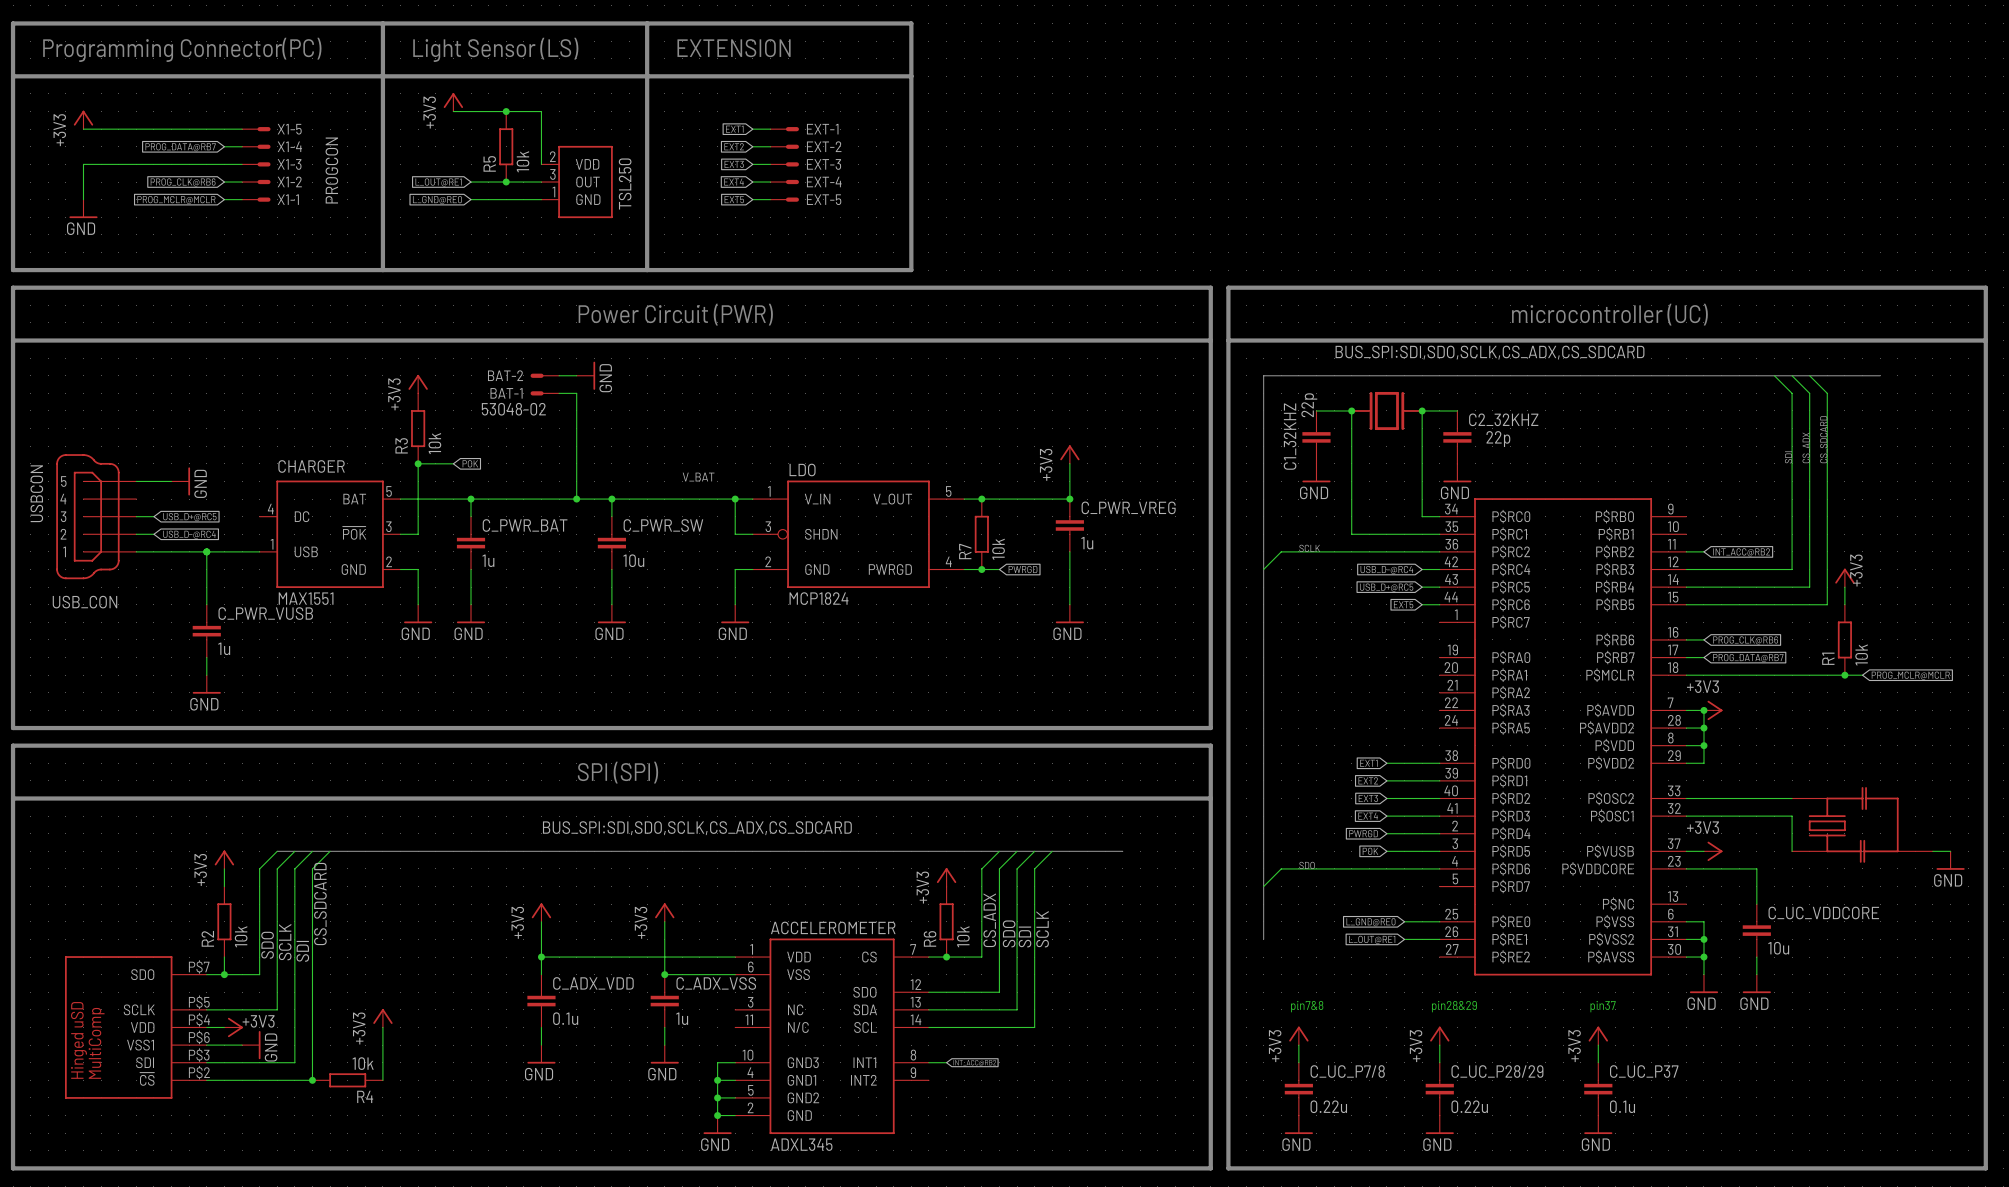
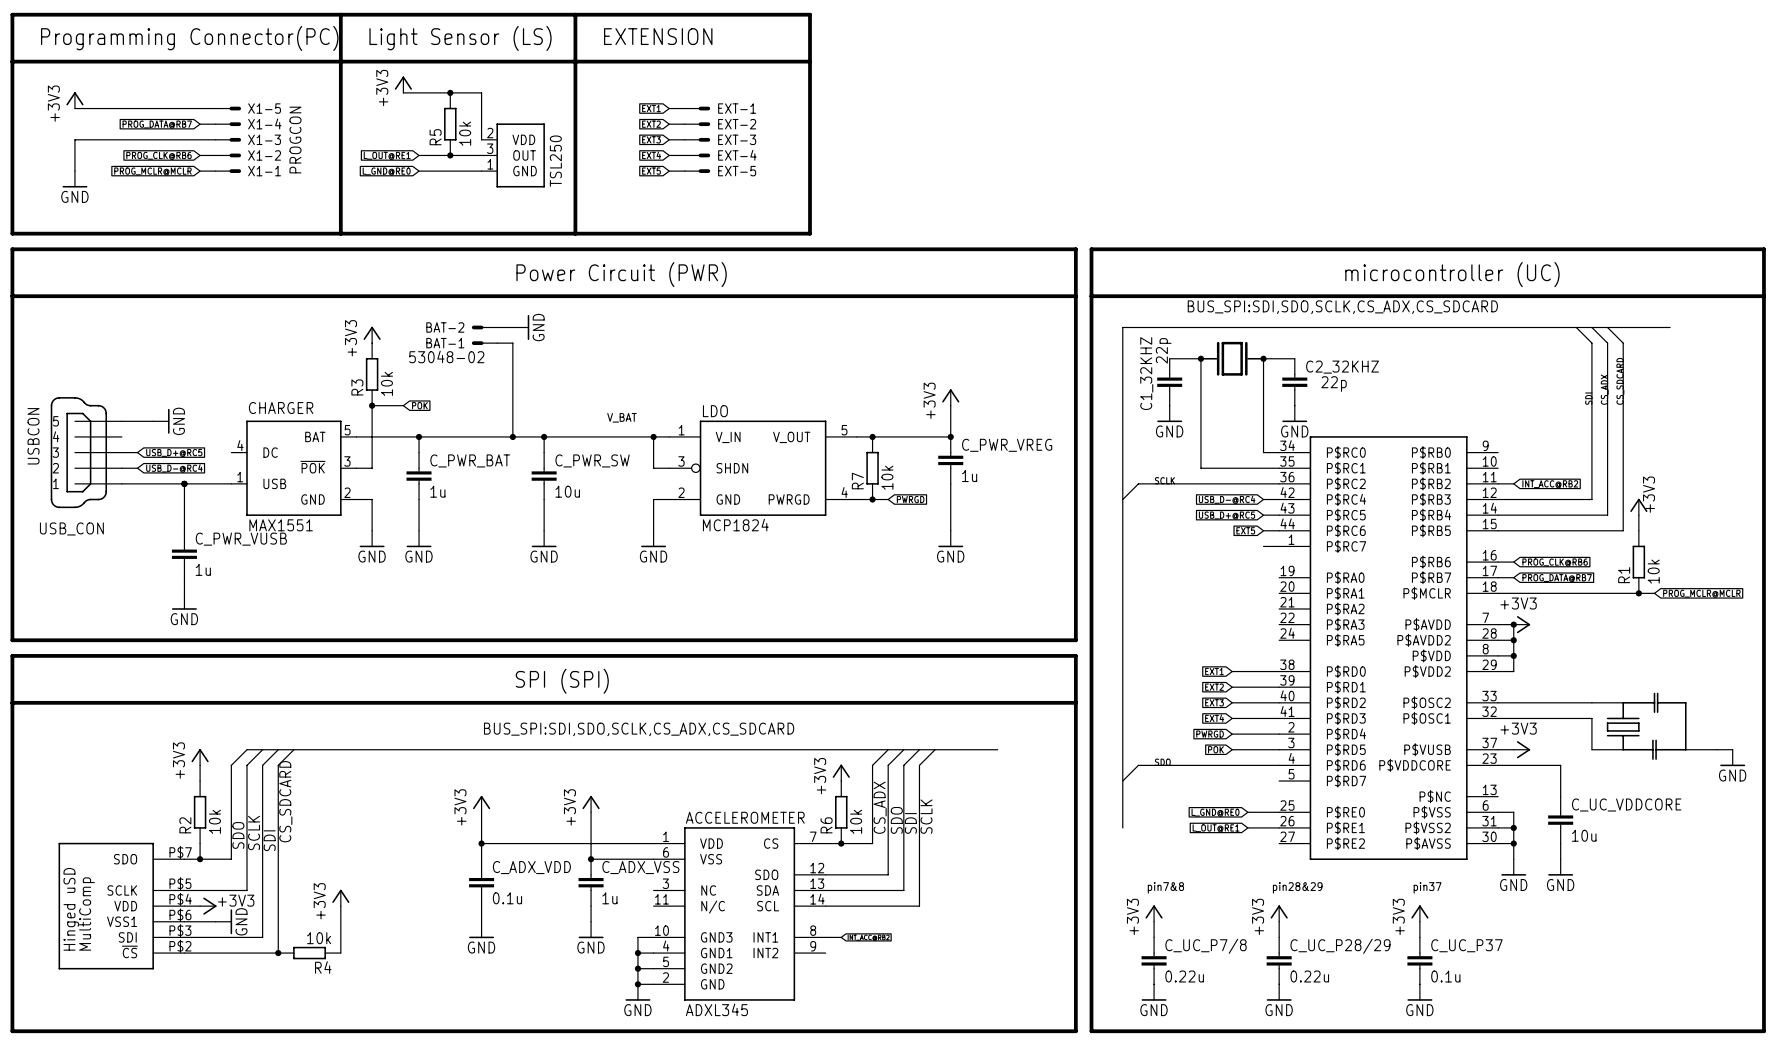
wire: none -> (1263, 546) (1279, 546)

